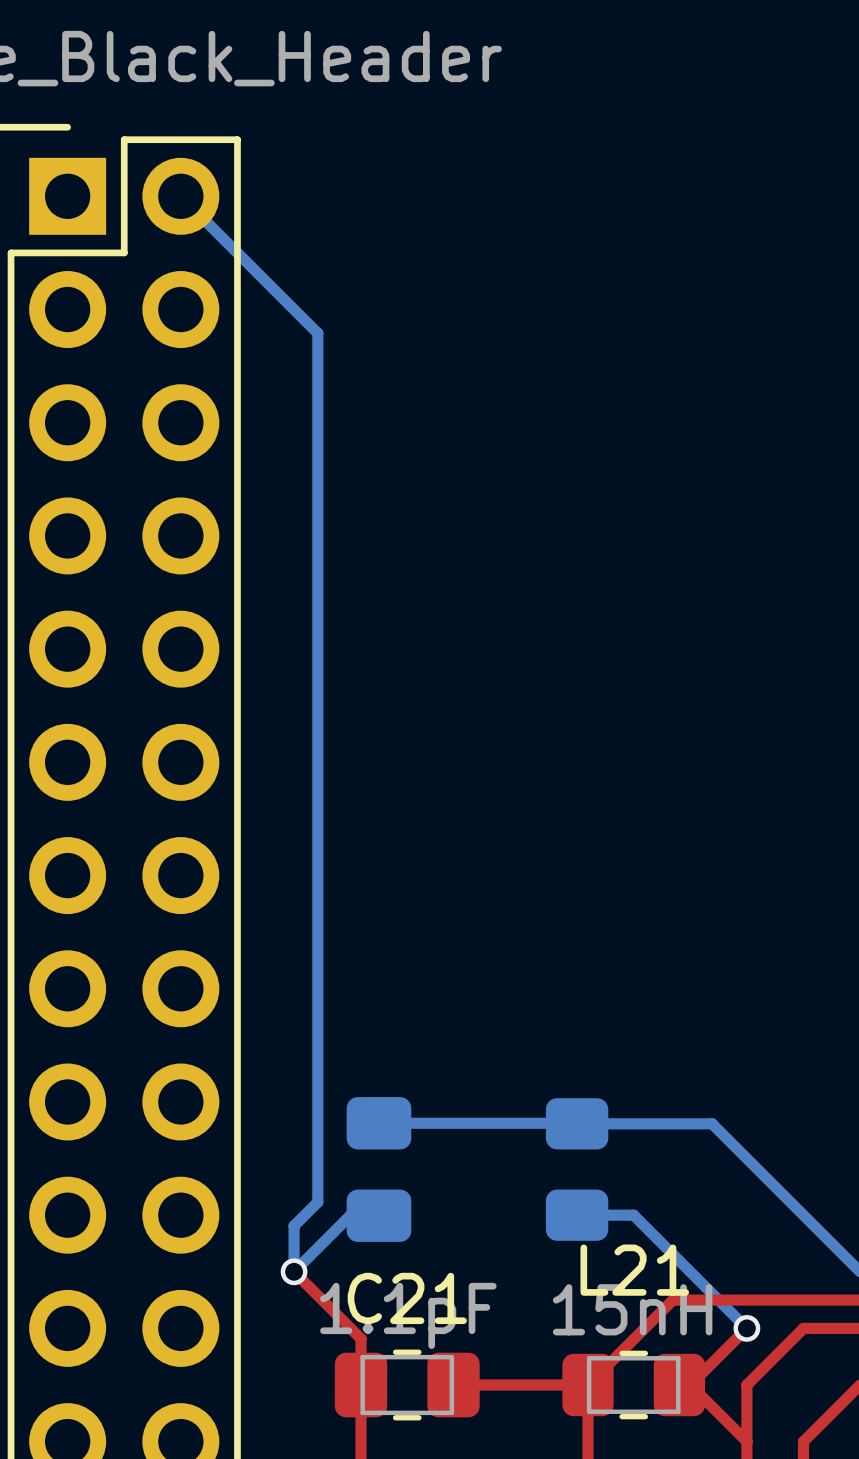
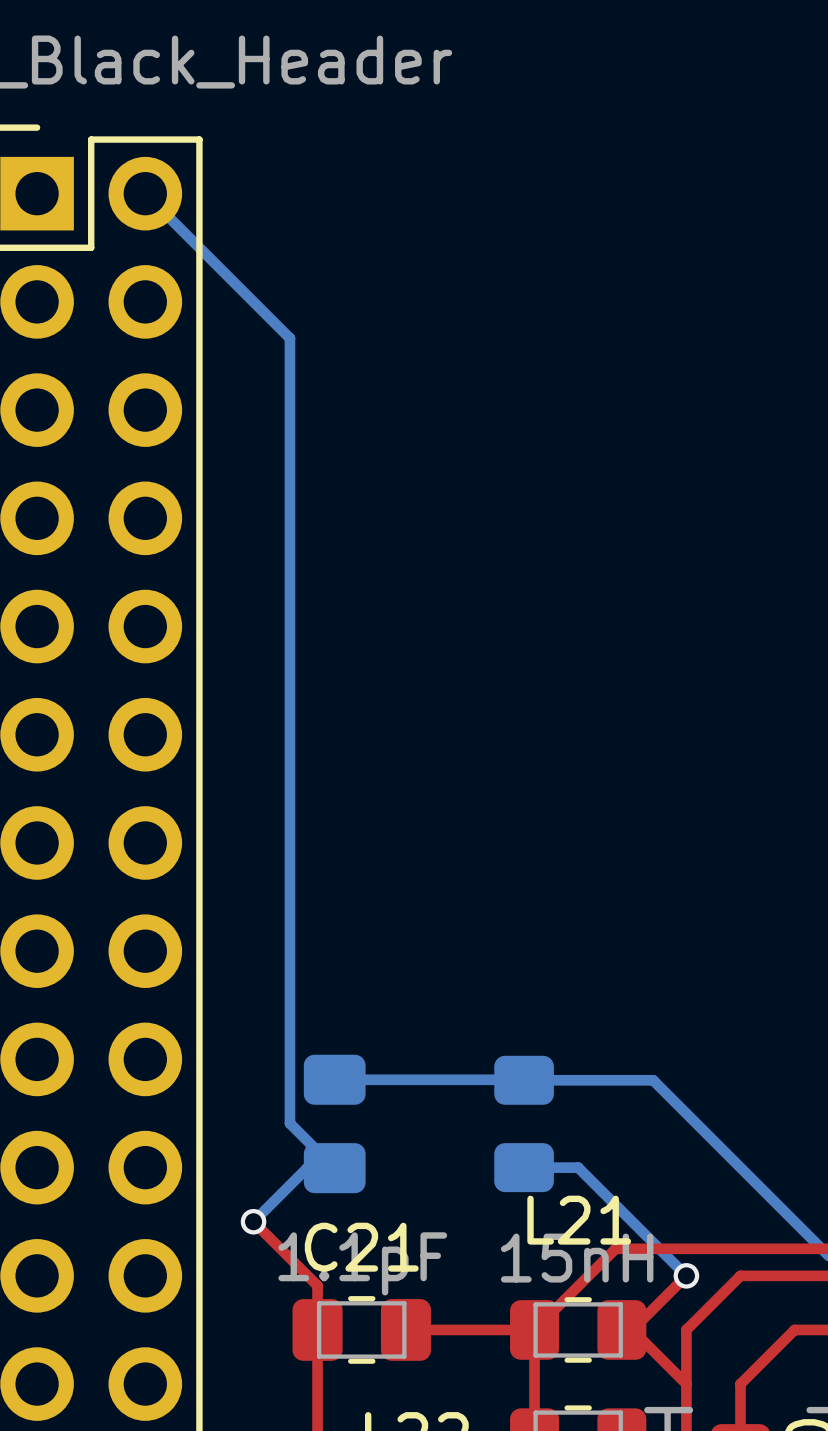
bottom track: (317, 333) (317, 1202) (294, 1225) (294, 1271) -> (276, 324) (289, 338) (289, 1123) (334, 1168)

